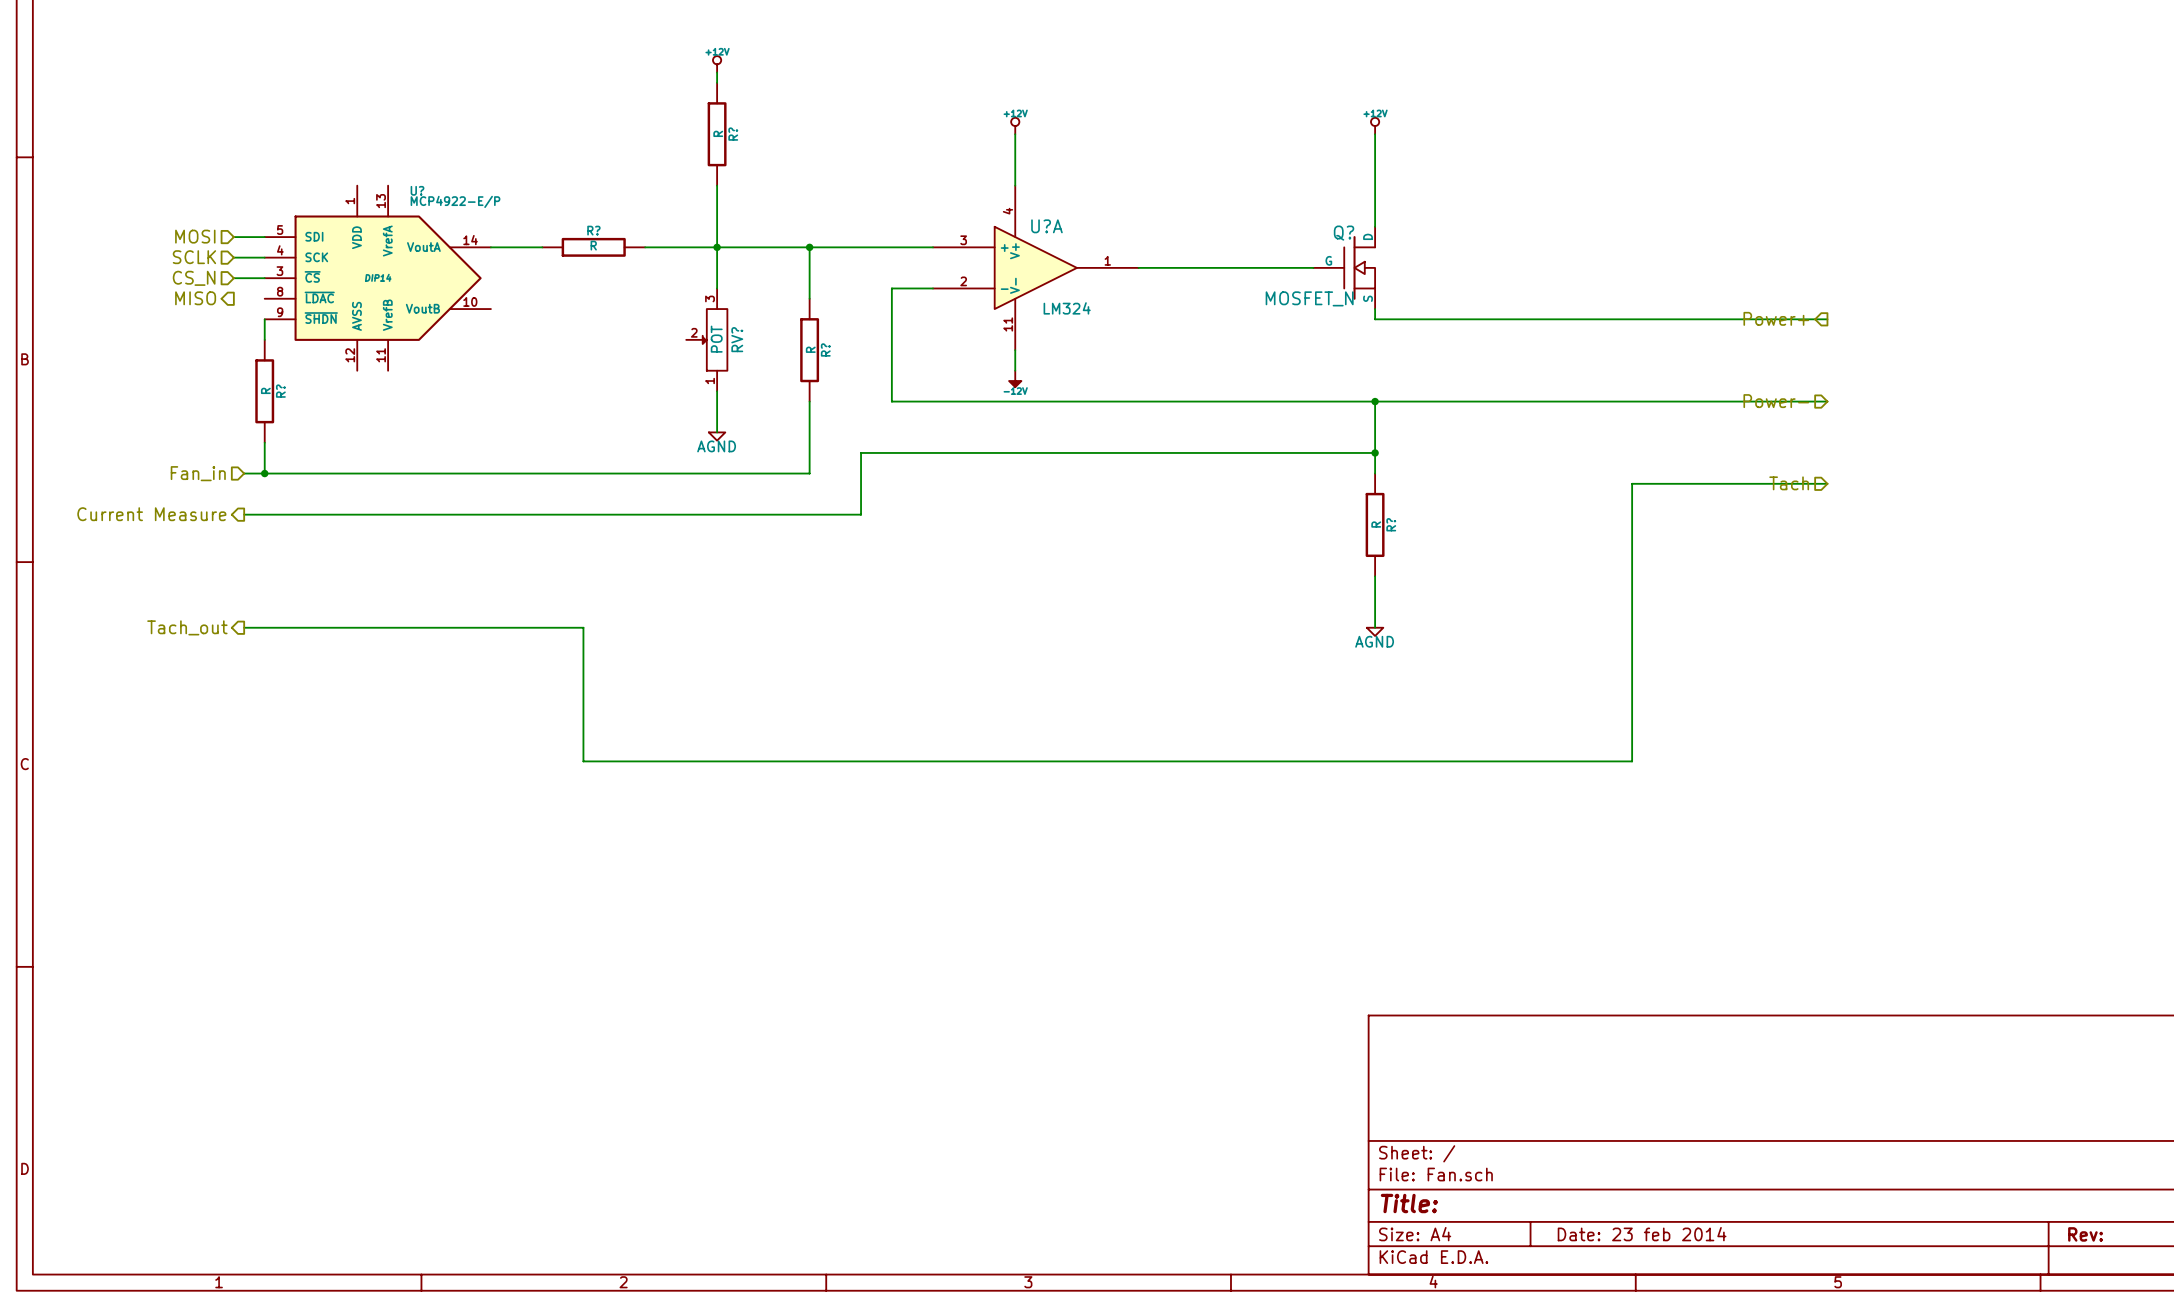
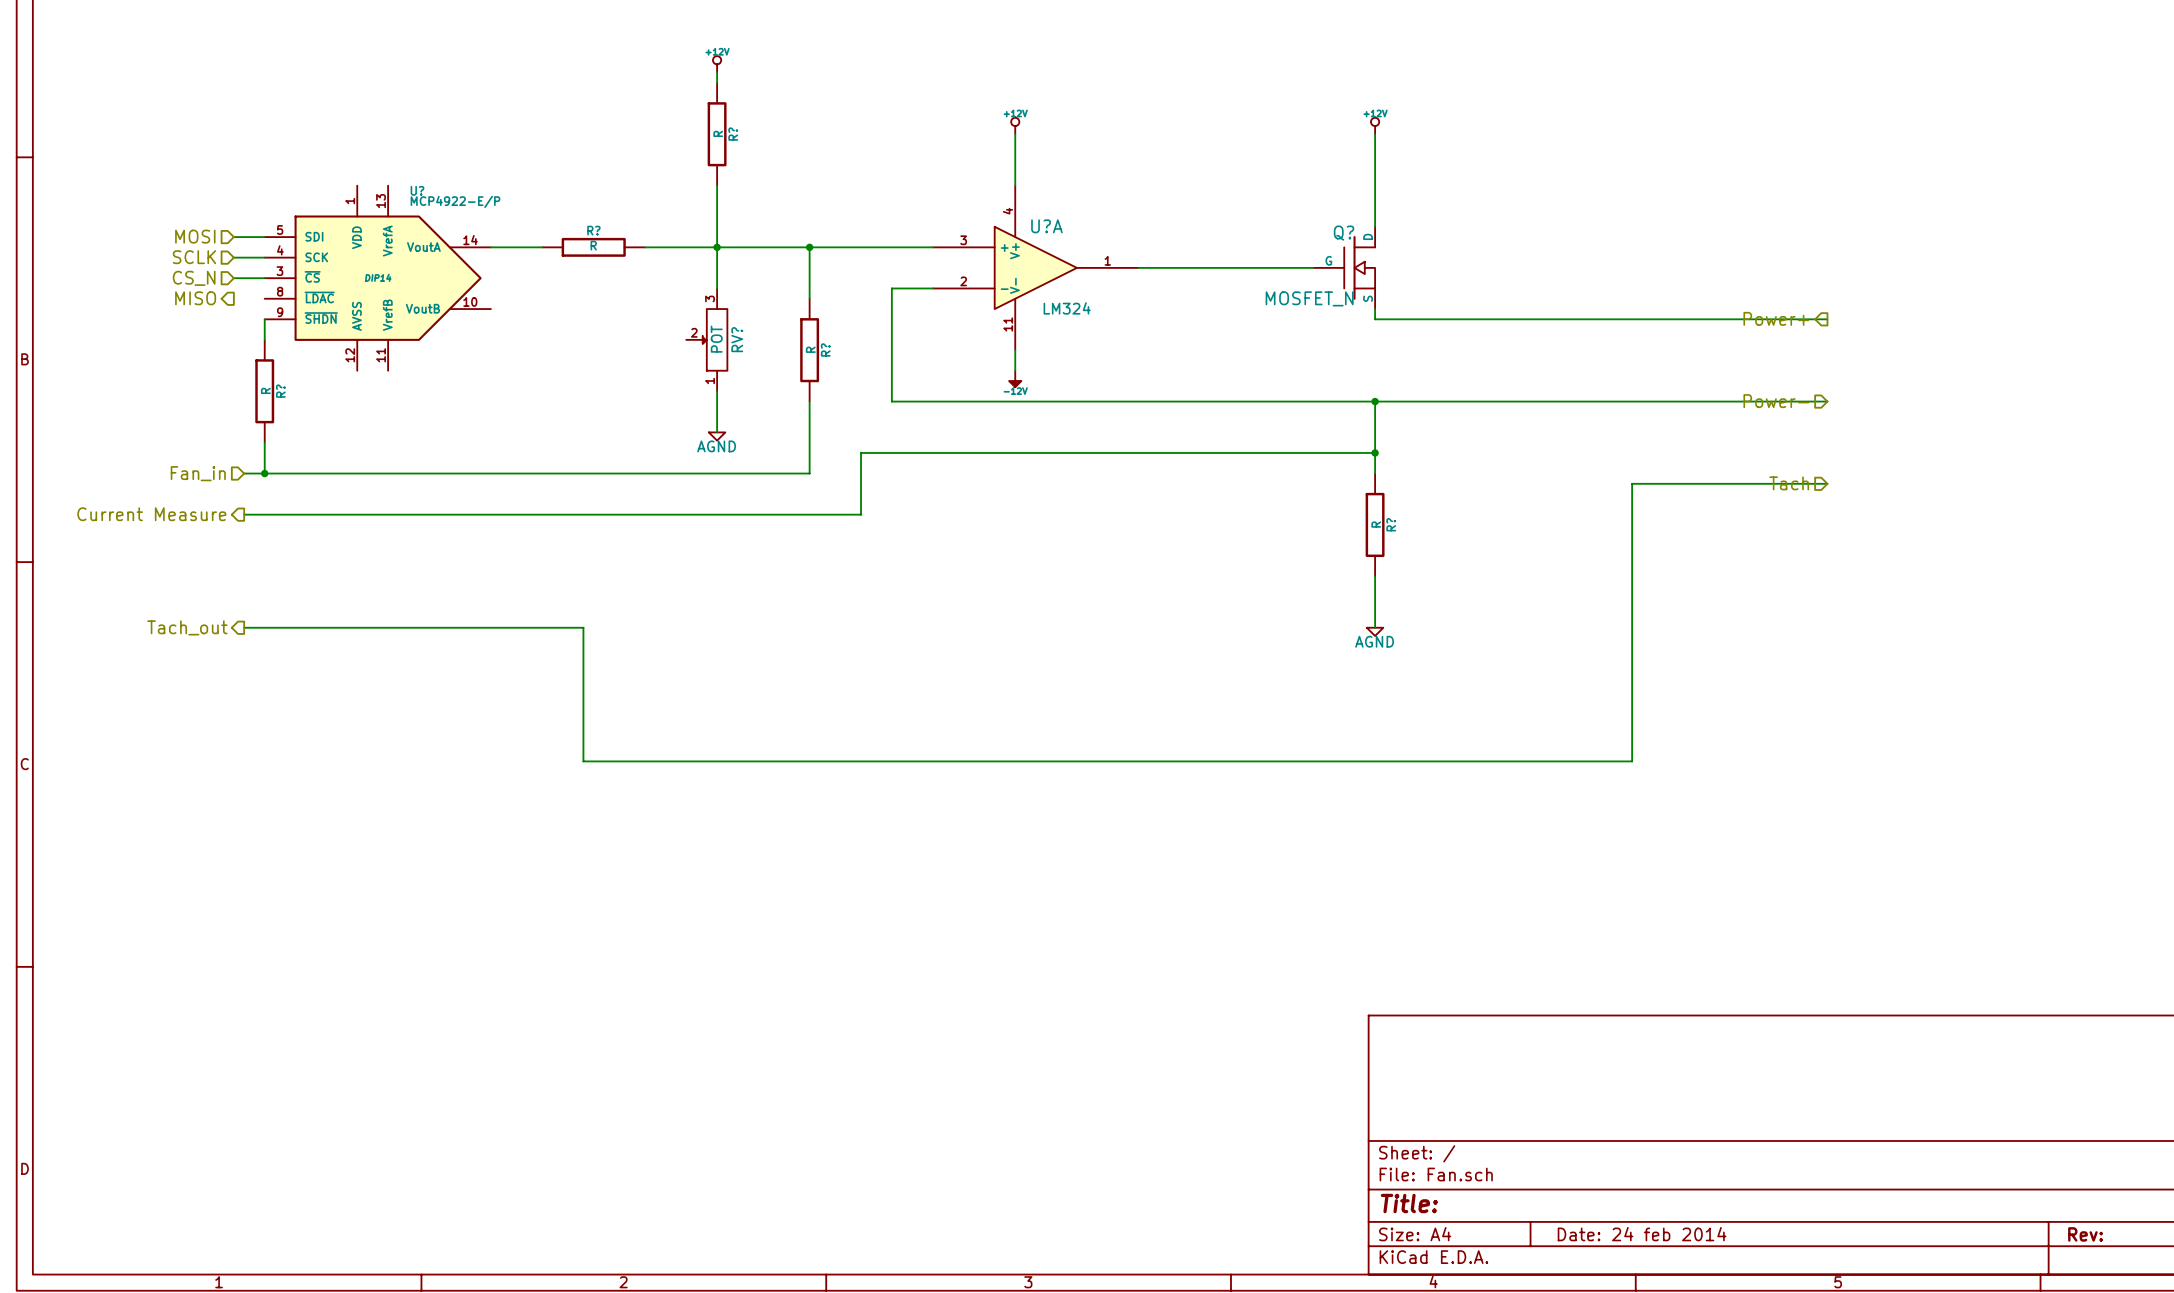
title block: Date: 23 feb 2014 (1642, 1234) -> Date: 24 feb 2014 (1642, 1234)

